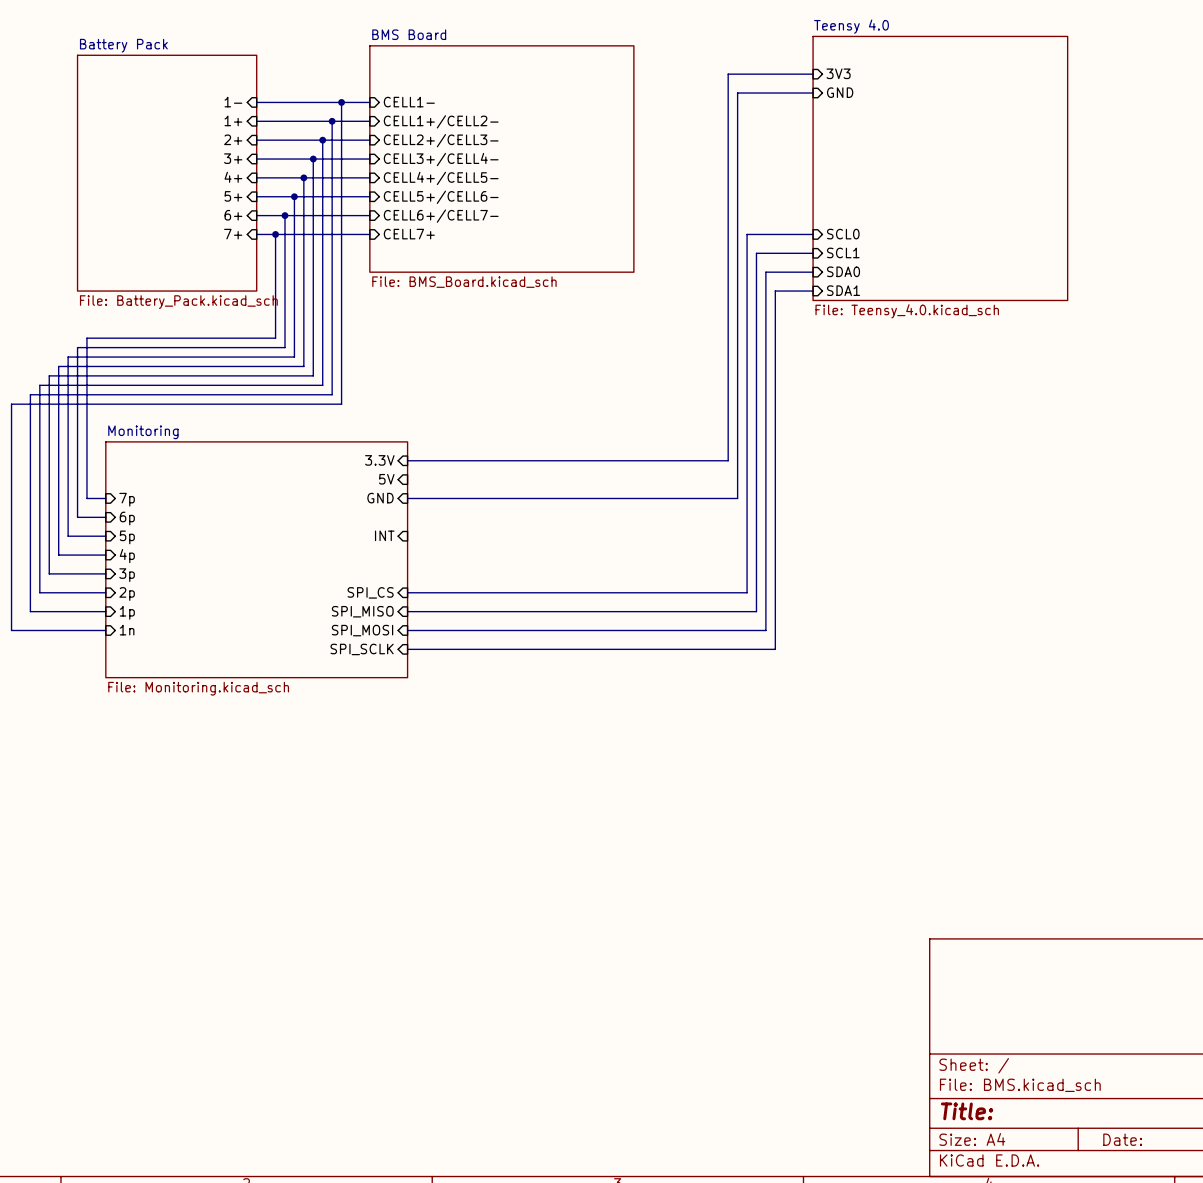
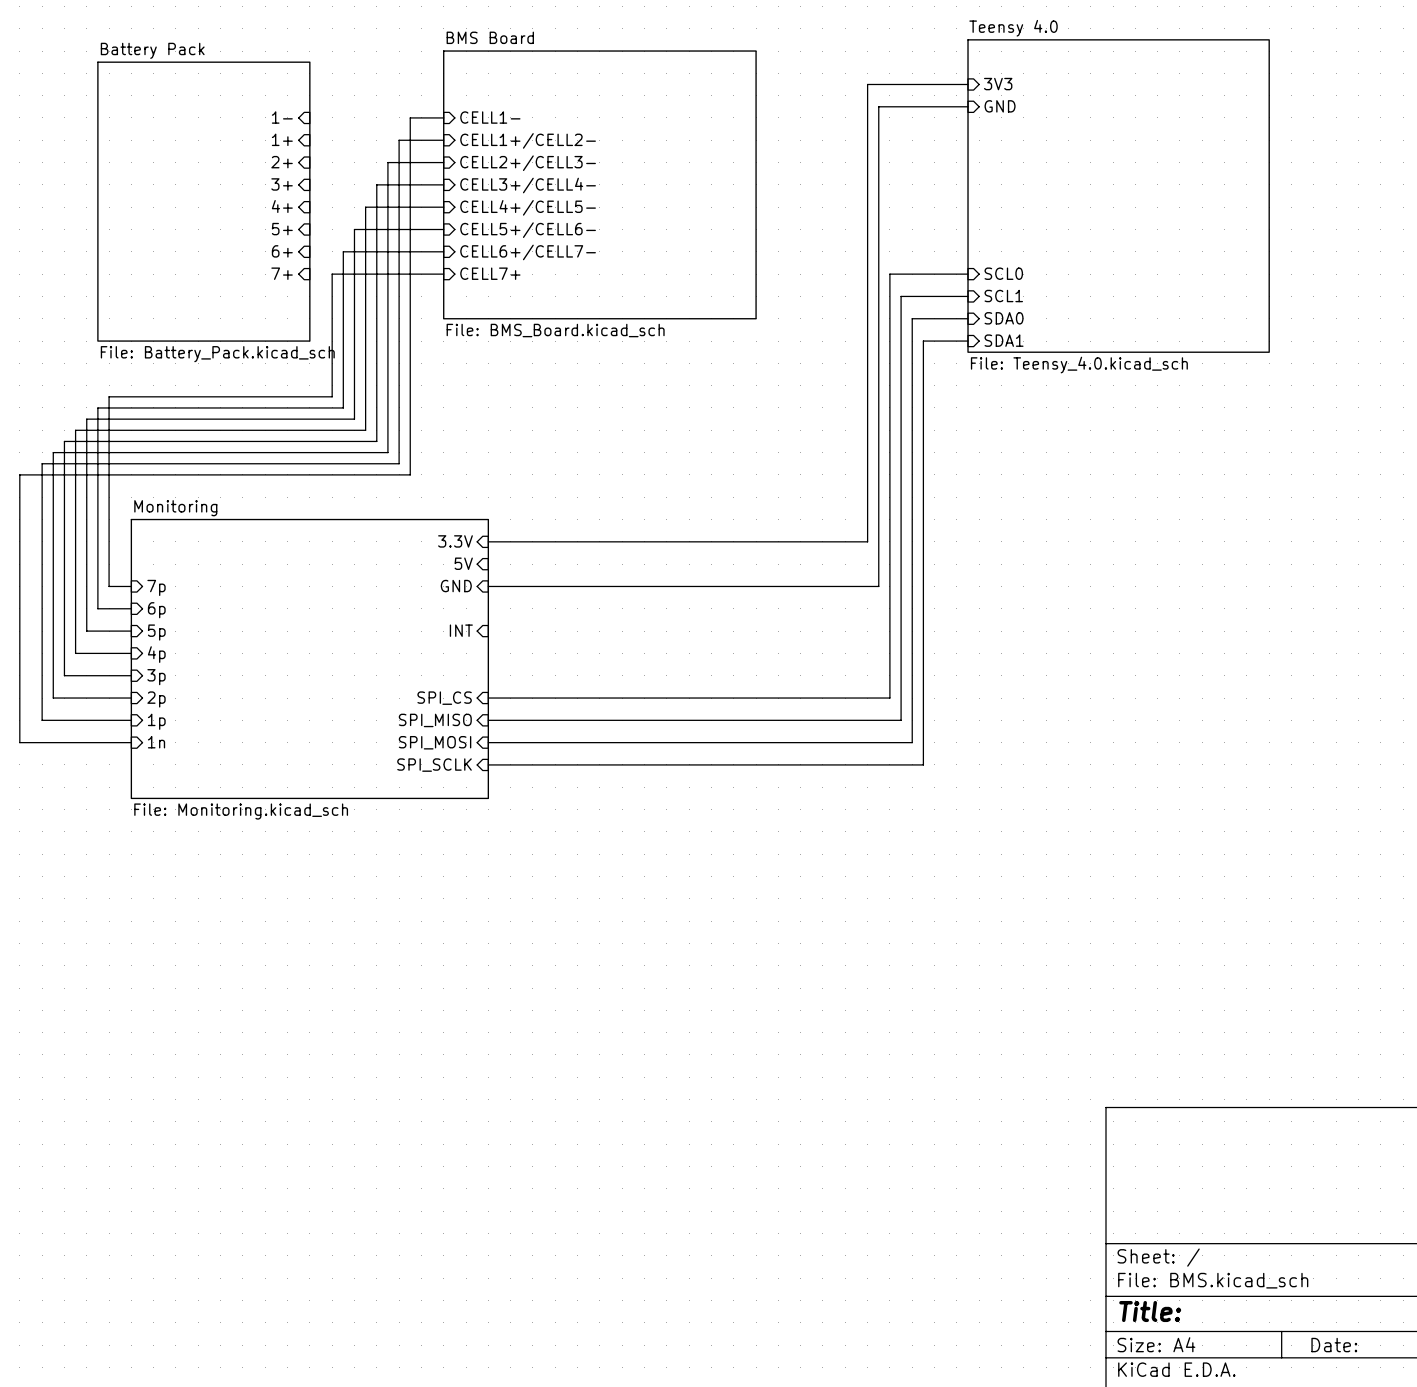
wire: (256, 102) (341, 102) -> none
junction: (341, 102) -> none
wire: (256, 121) (332, 121) -> none
junction: (332, 121) -> none
wire: (256, 140) (322, 140) -> none
junction: (322, 140) -> none
wire: (256, 159) (313, 159) -> none
junction: (313, 159) -> none
wire: (256, 177) (303, 177) -> none
junction: (303, 177) -> none
wire: (256, 196) (294, 196) -> none
junction: (294, 196) -> none
wire: (256, 215) (284, 215) -> none
junction: (284, 215) -> none
wire: (256, 234) (275, 234) -> none
junction: (275, 234) -> none

